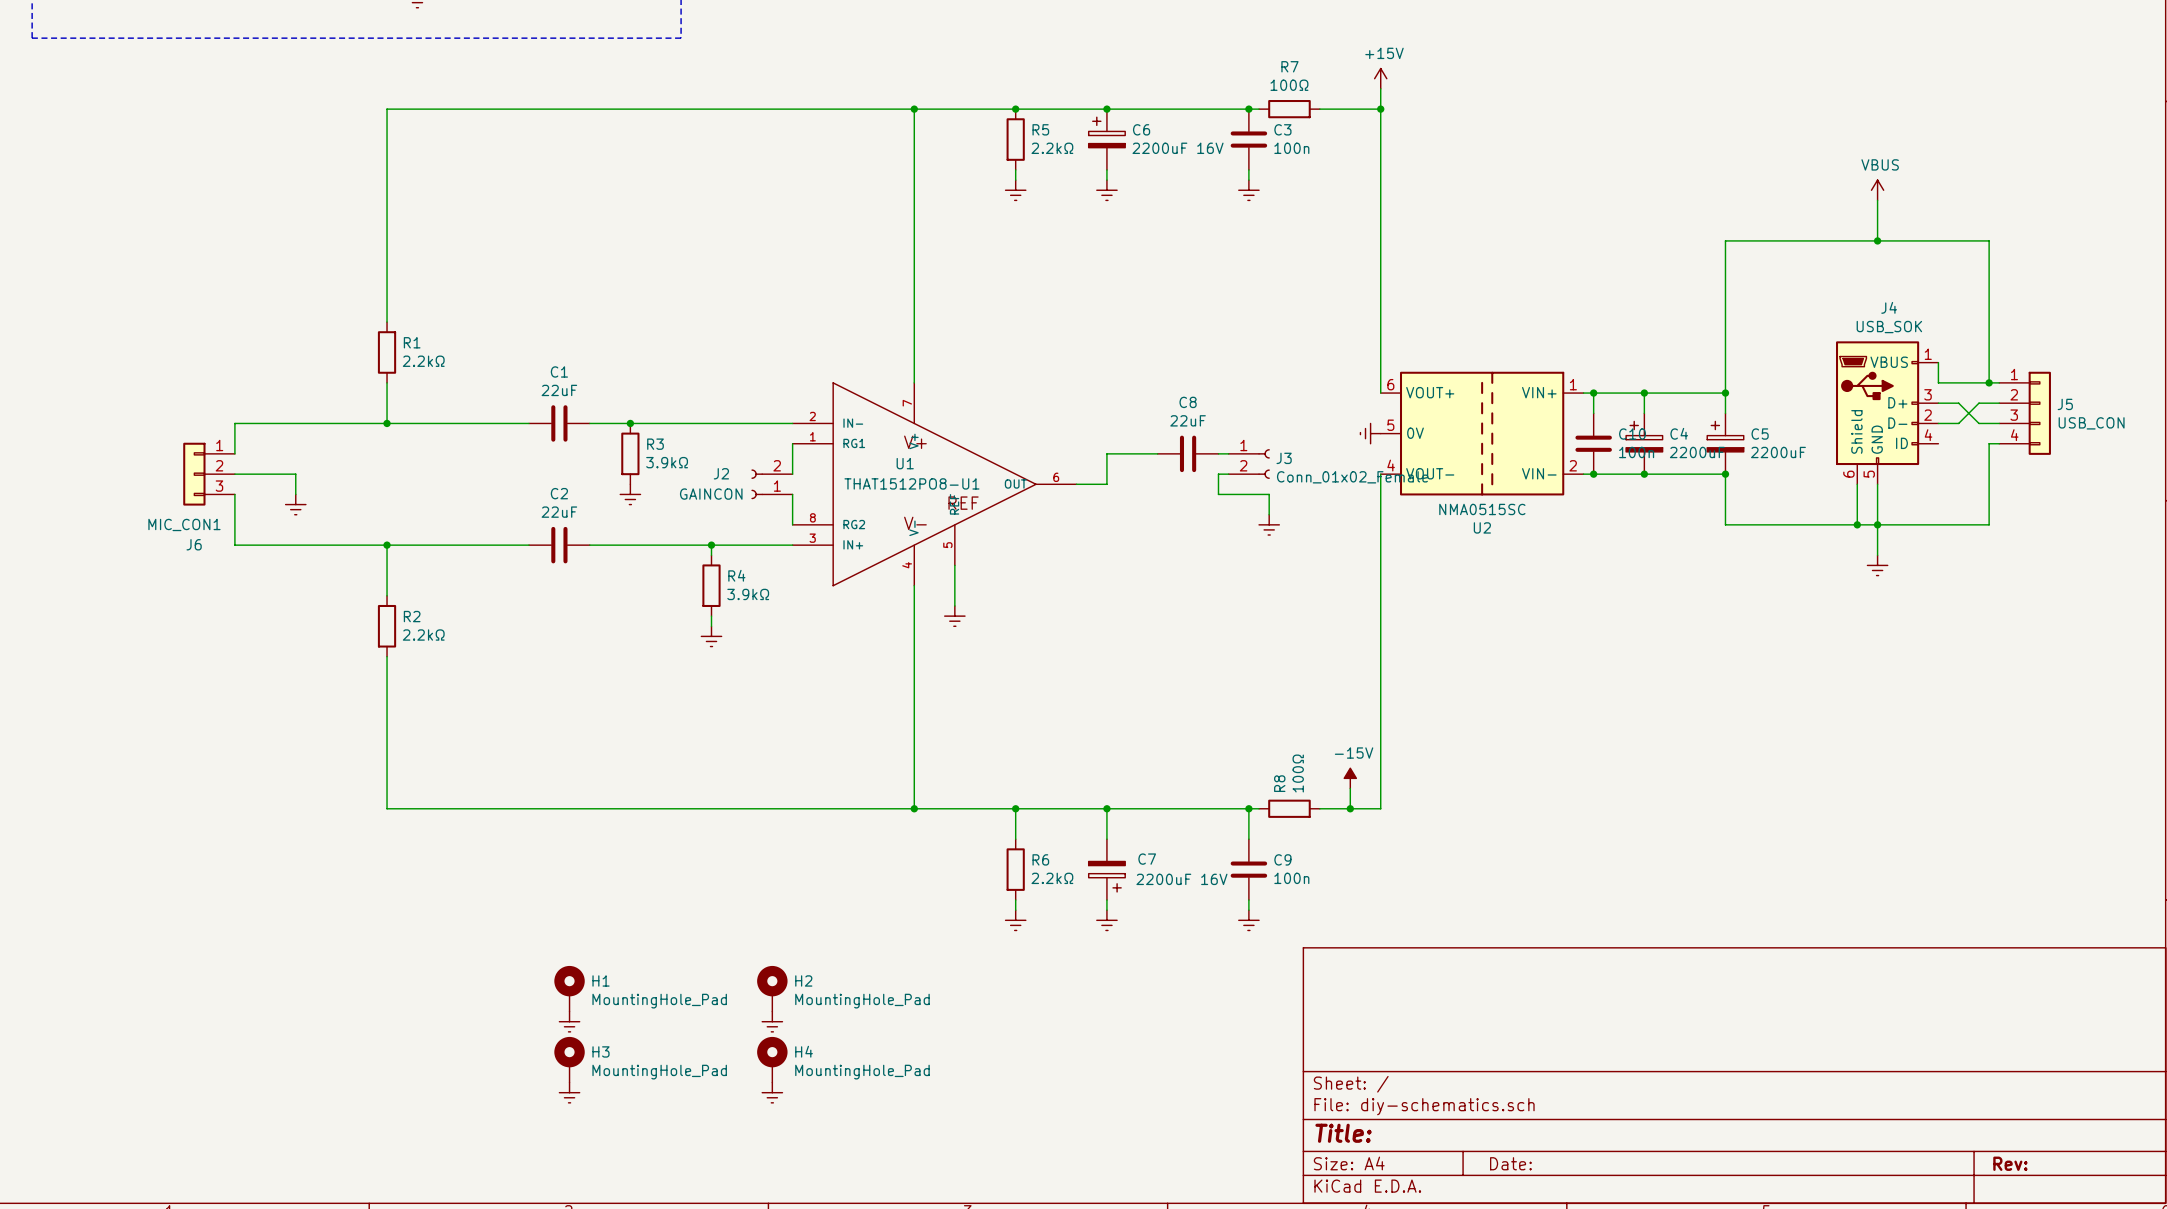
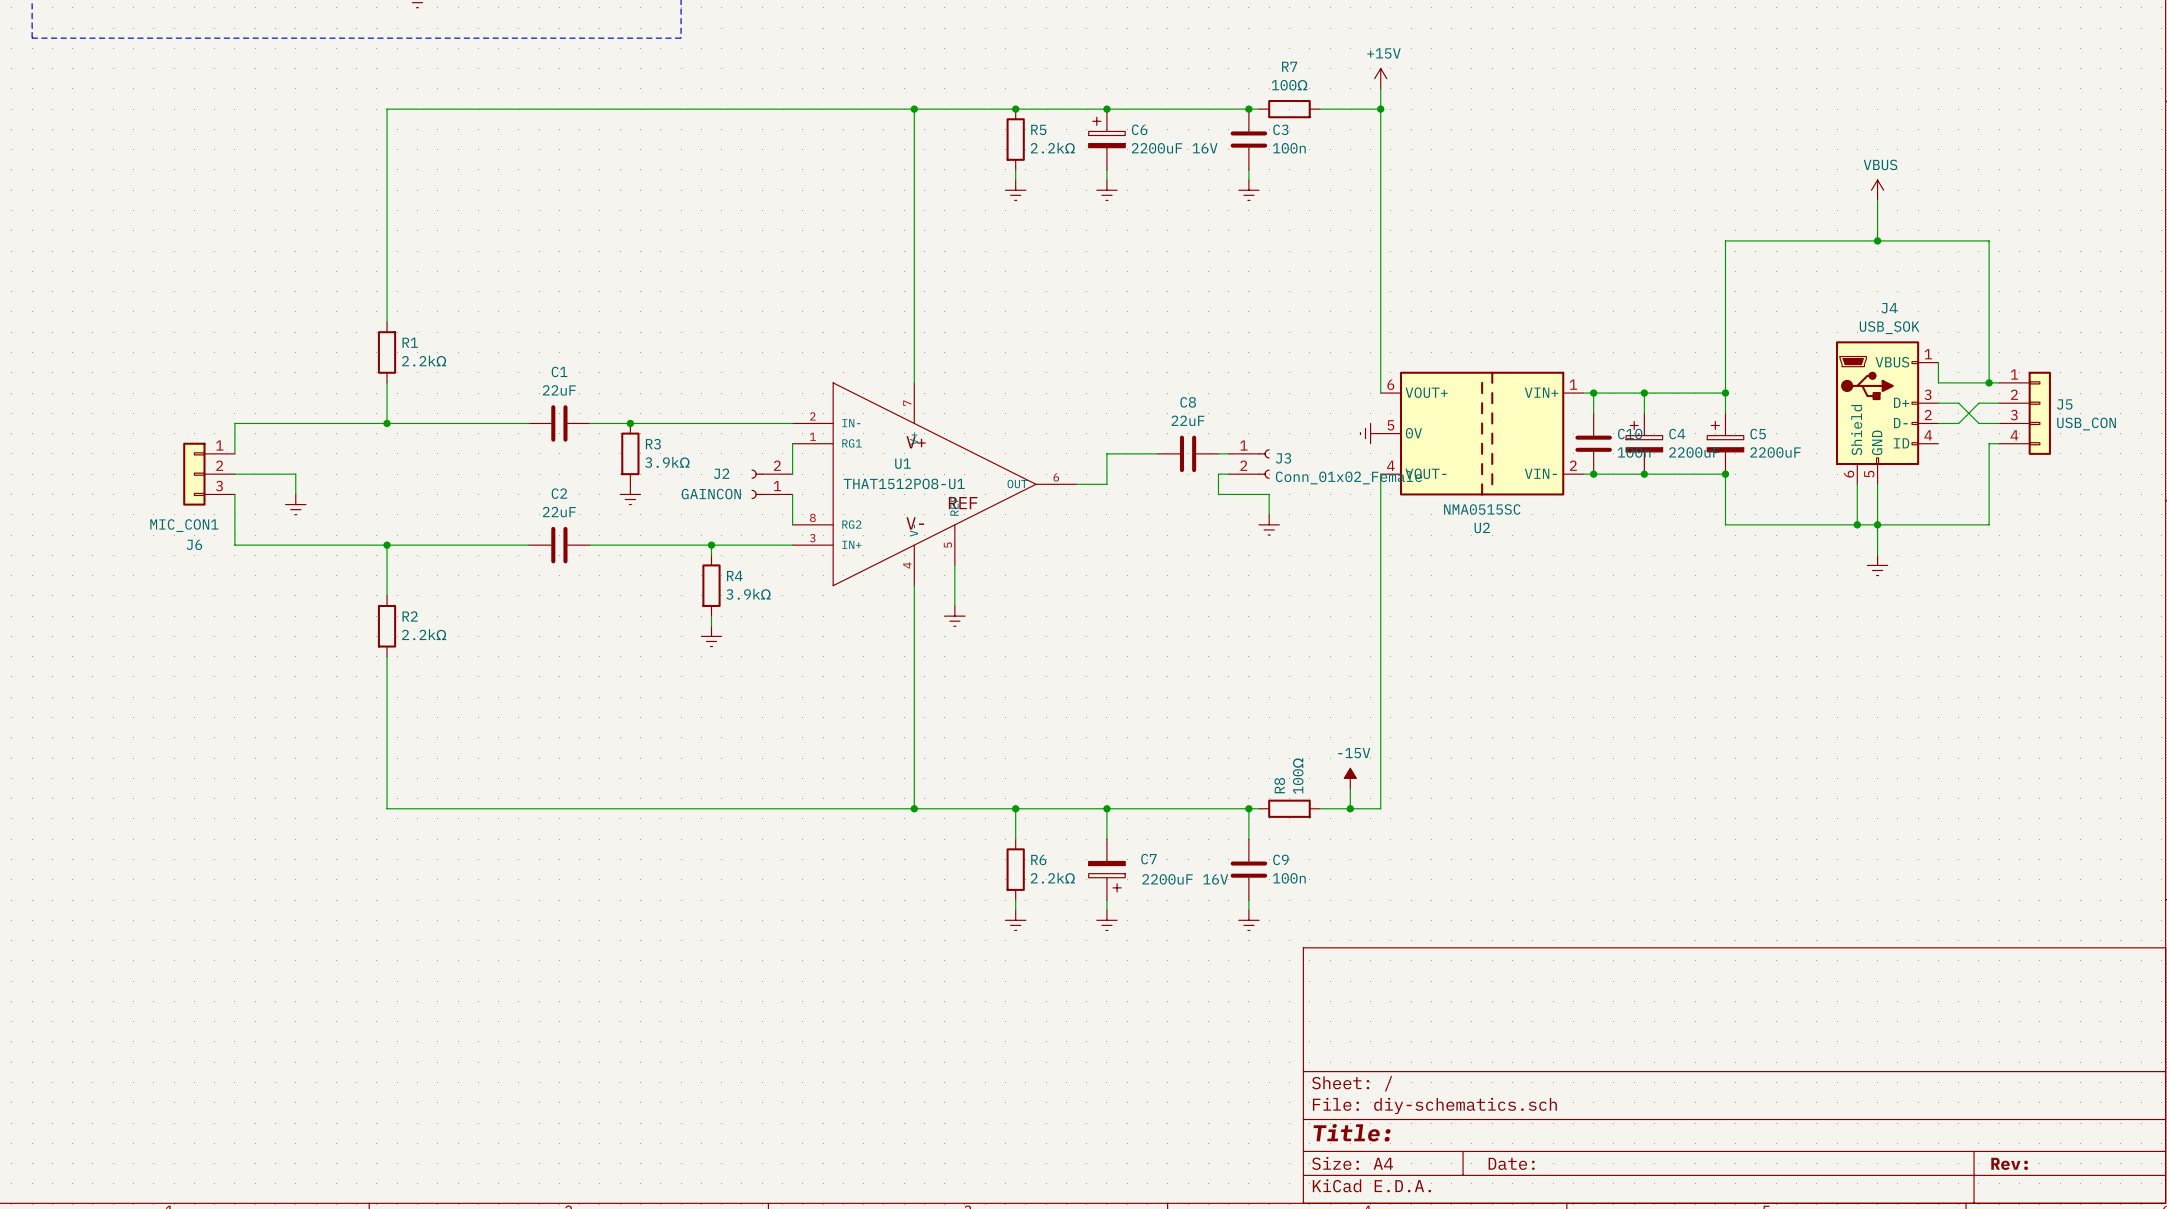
H1: MountingHole_Pad (569, 988) -> none
H2: MountingHole_Pad (772, 988) -> none
power symbol: (569, 1021) -> none
power symbol: (772, 1021) -> none
H3: MountingHole_Pad (569, 1059) -> none
H4: MountingHole_Pad (772, 1059) -> none
power symbol: (569, 1092) -> none
power symbol: (772, 1092) -> none

